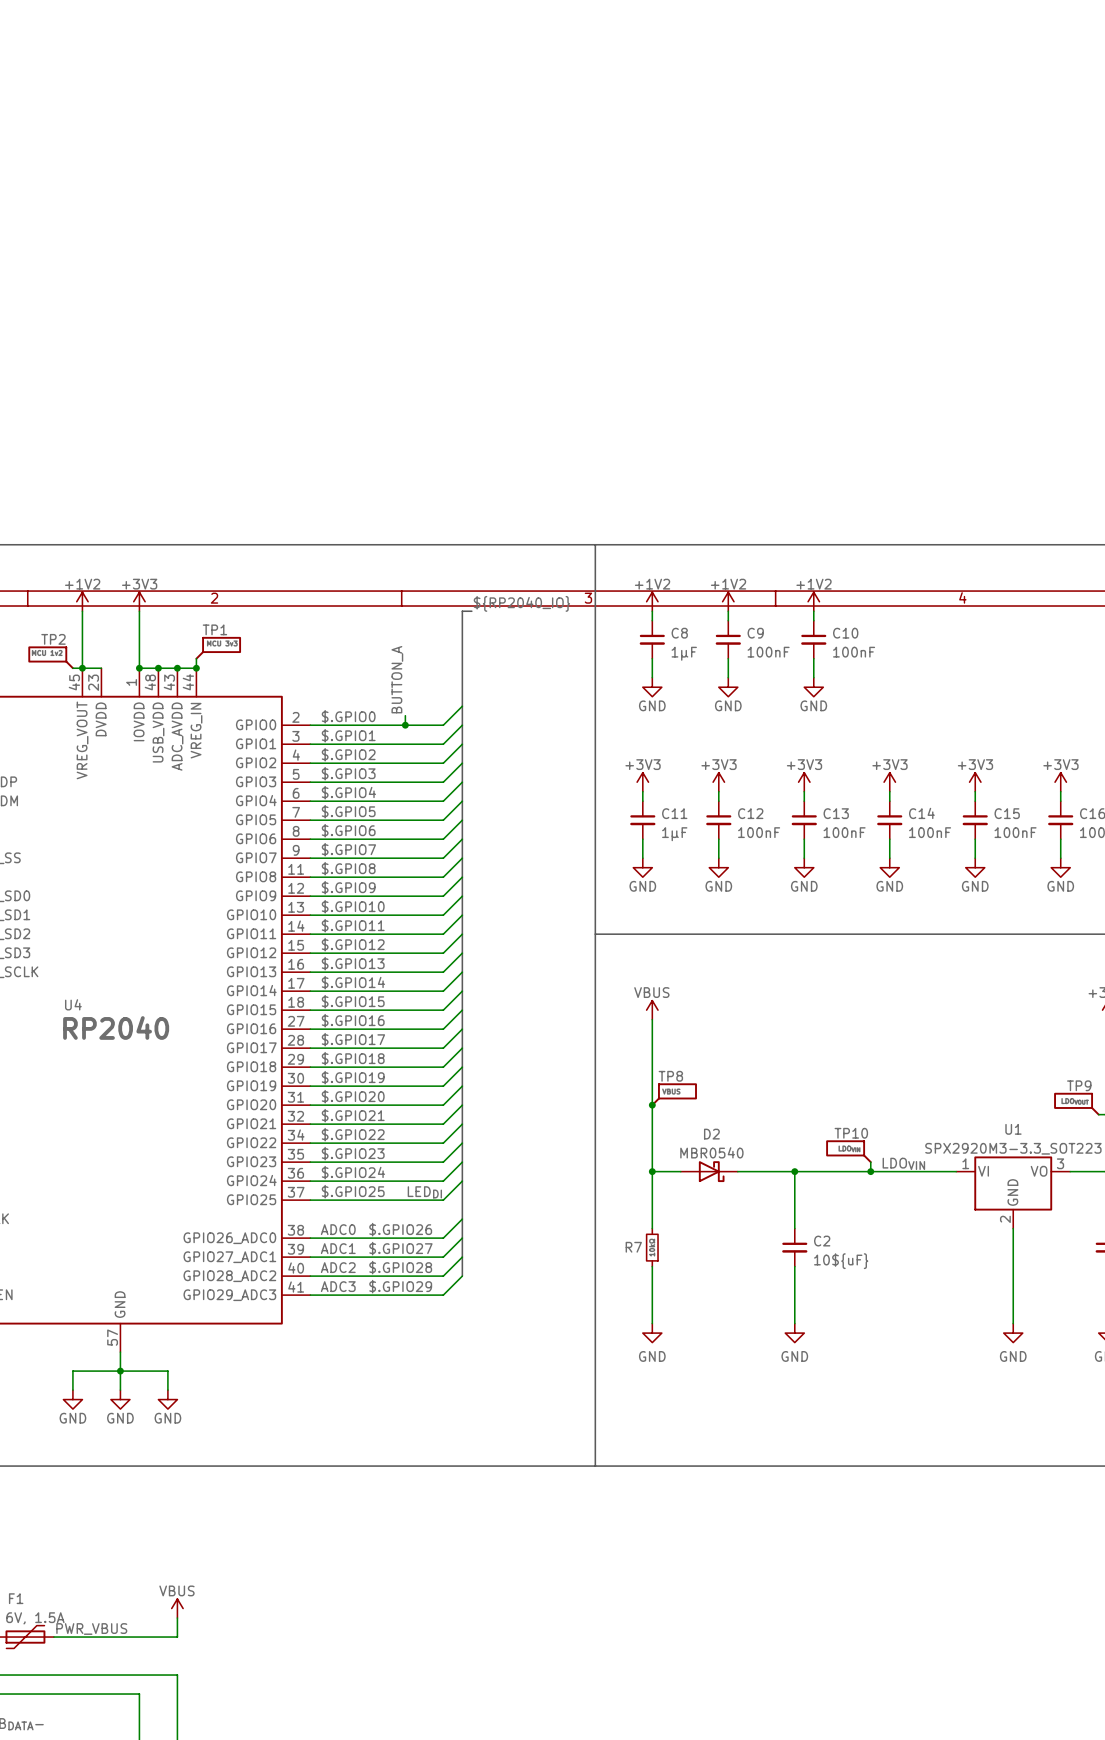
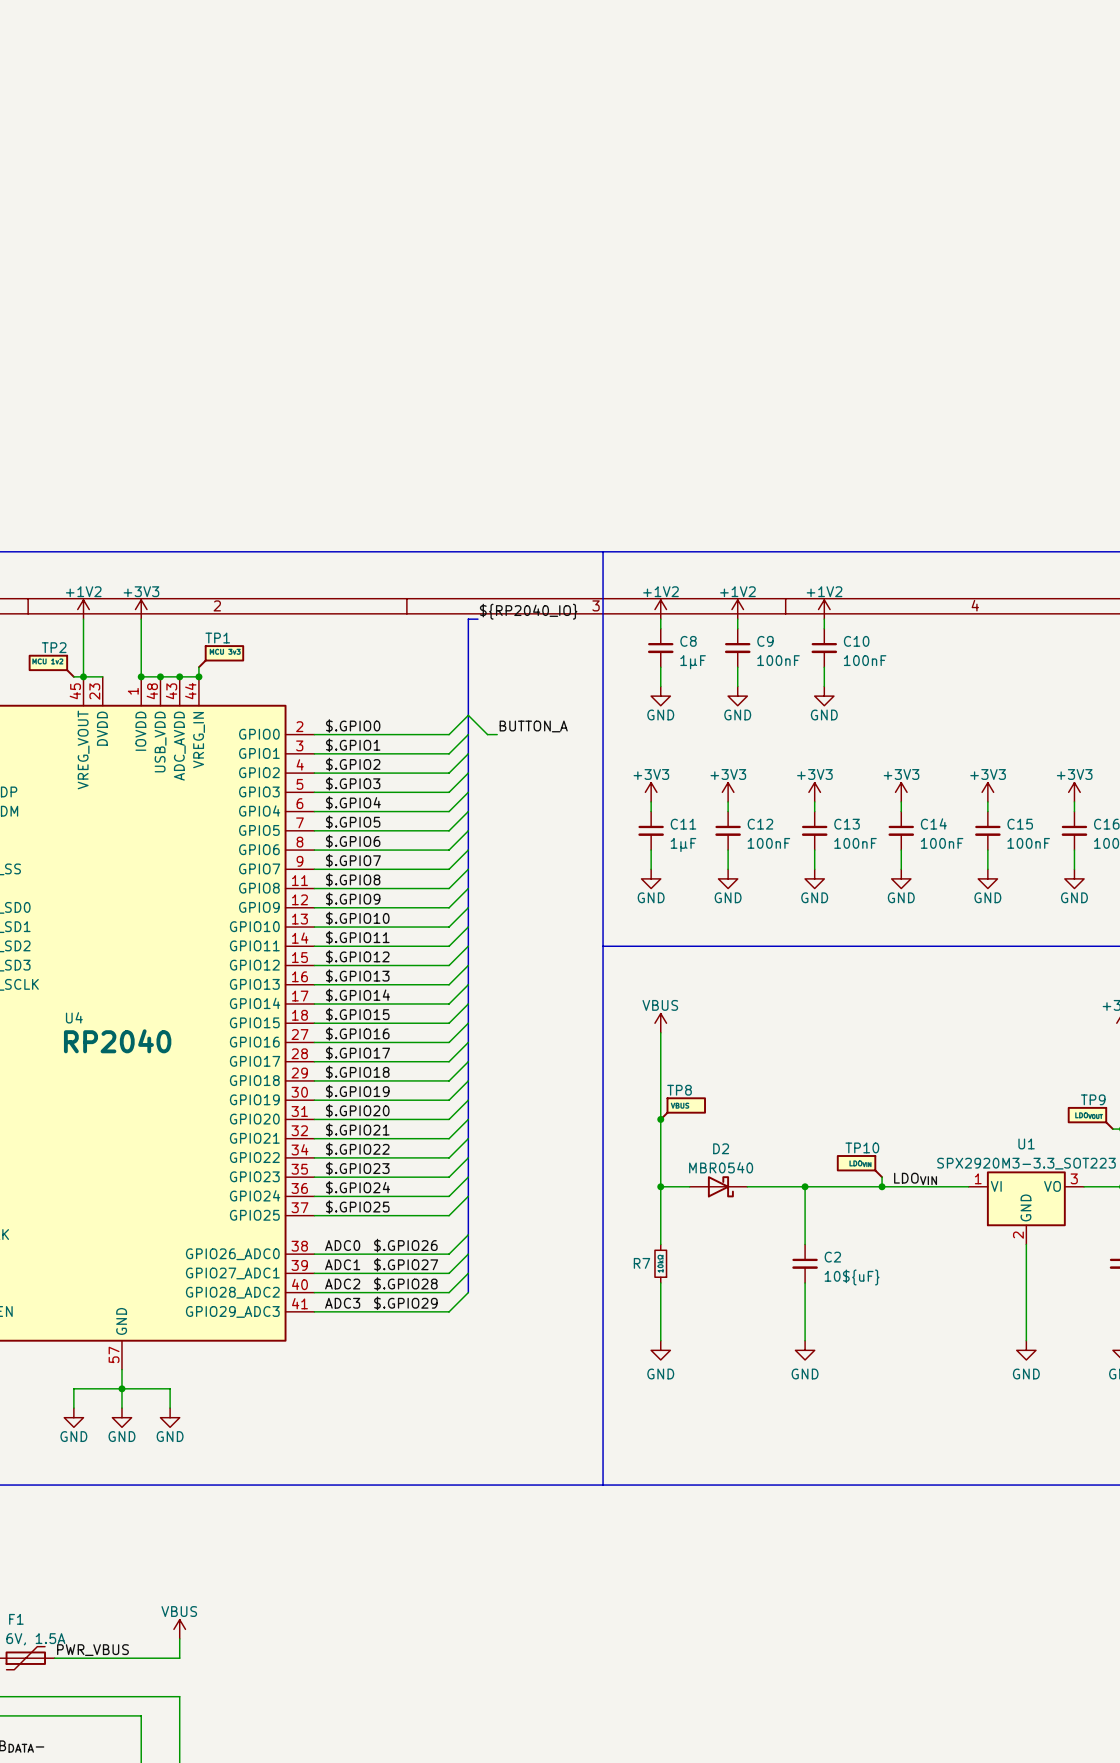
label rotation: 0° (397, 679) -> 90° clockwise (533, 726)
label position: BUTTON_A (397, 679) -> BUTTON_A (533, 726)
wire: none -> (468, 715) (487, 734) (497, 734)
wire: (405, 715) (405, 725) -> none
junction: (405, 725) -> none
label: LEDDI (424, 1192) -> none

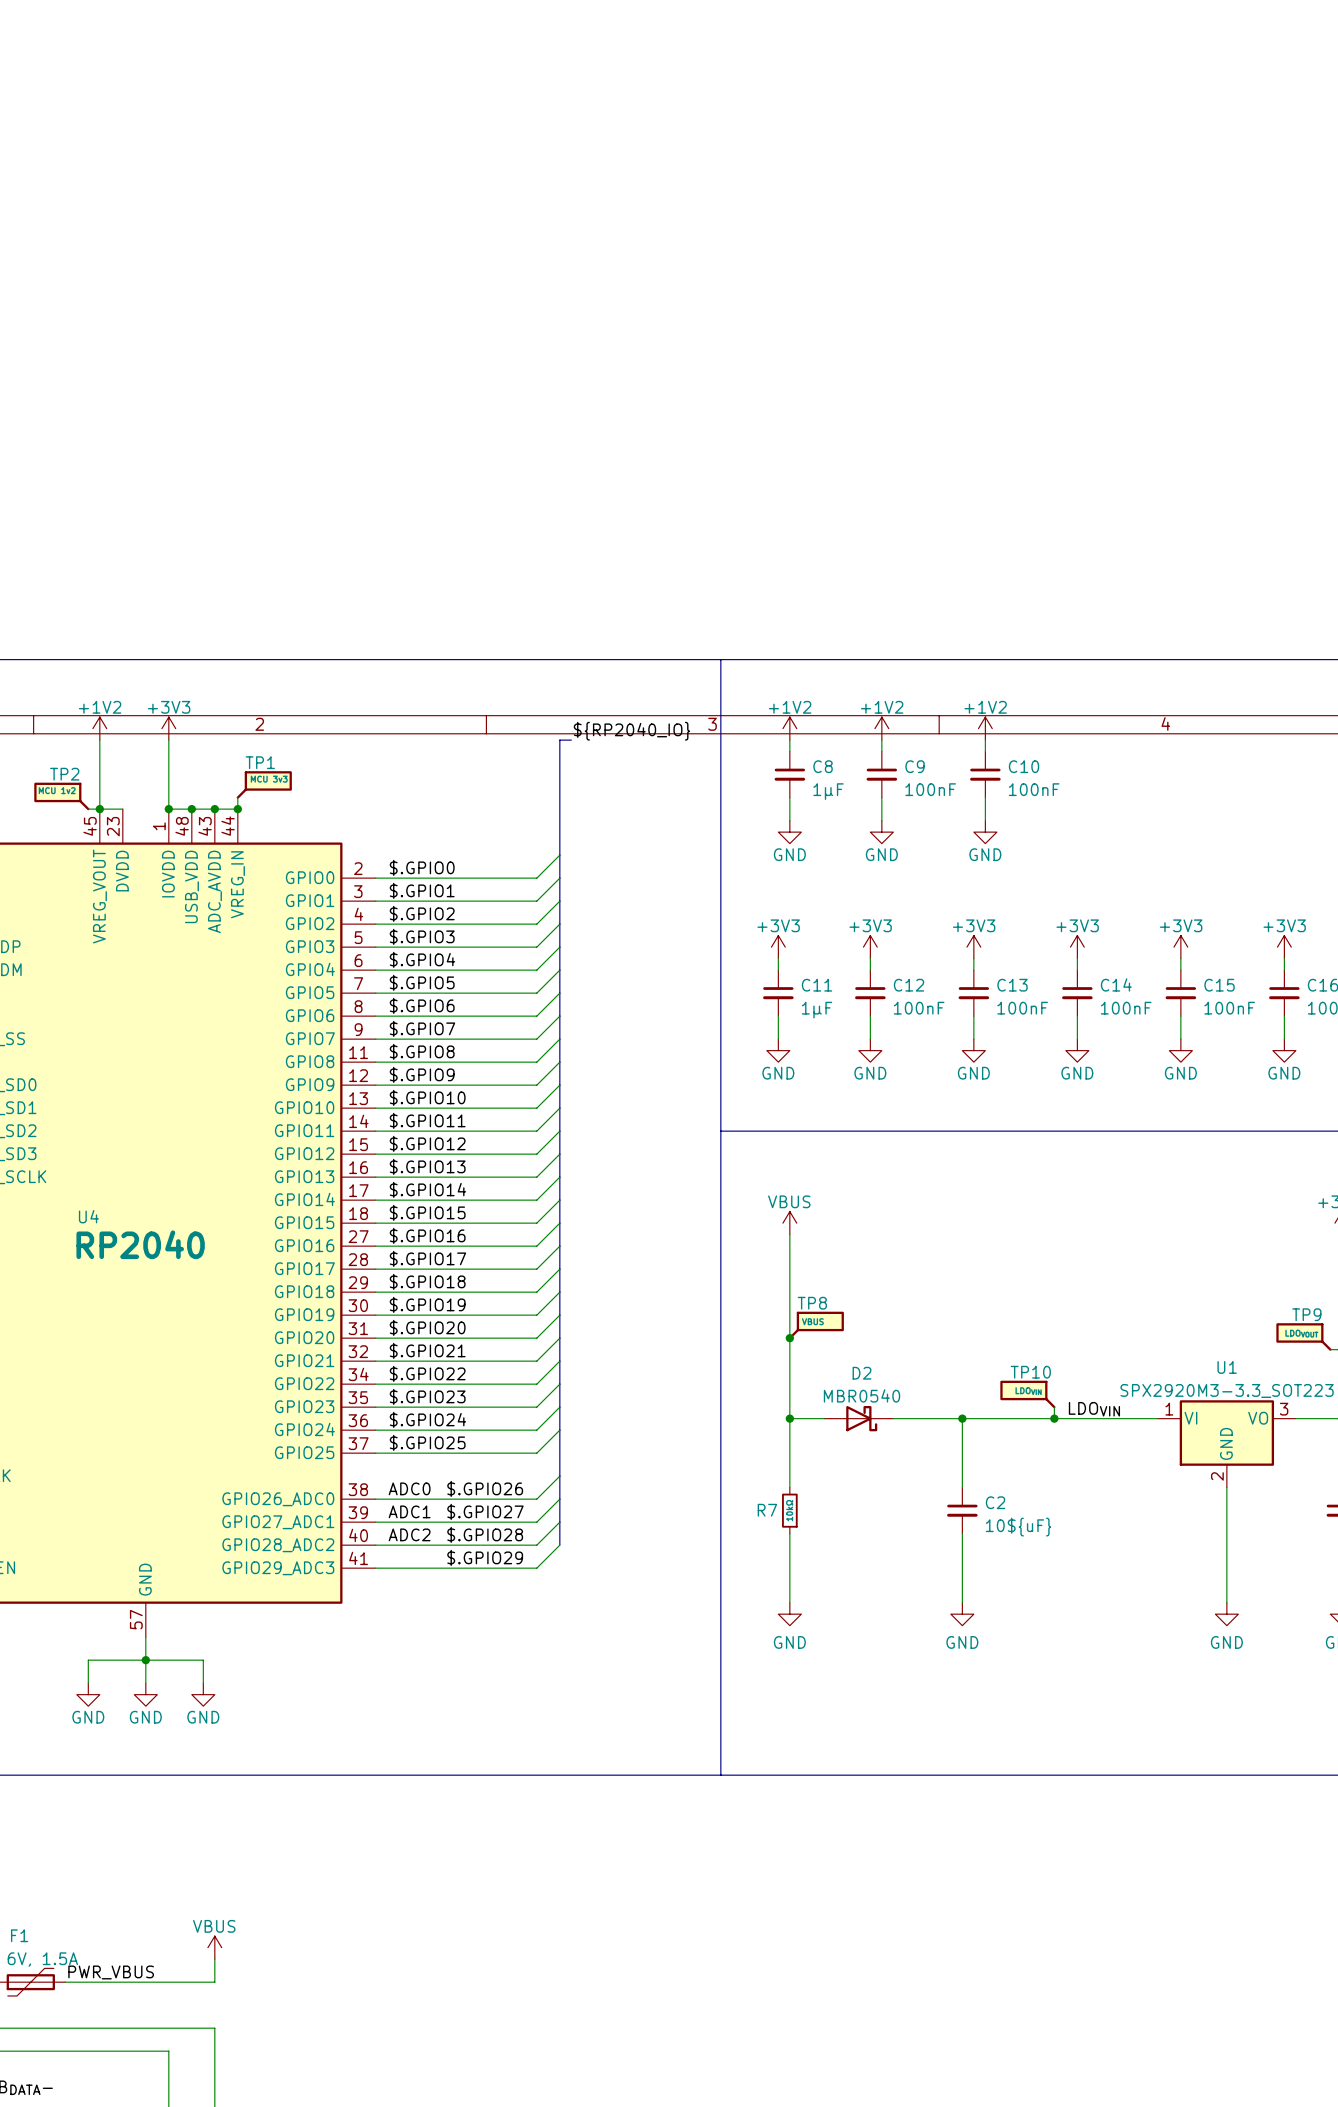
wire: (468, 715) (487, 734) (497, 734) -> none
label: BUTTON_A (533, 726) -> none
label: ADC3 (342, 1303) -> none

